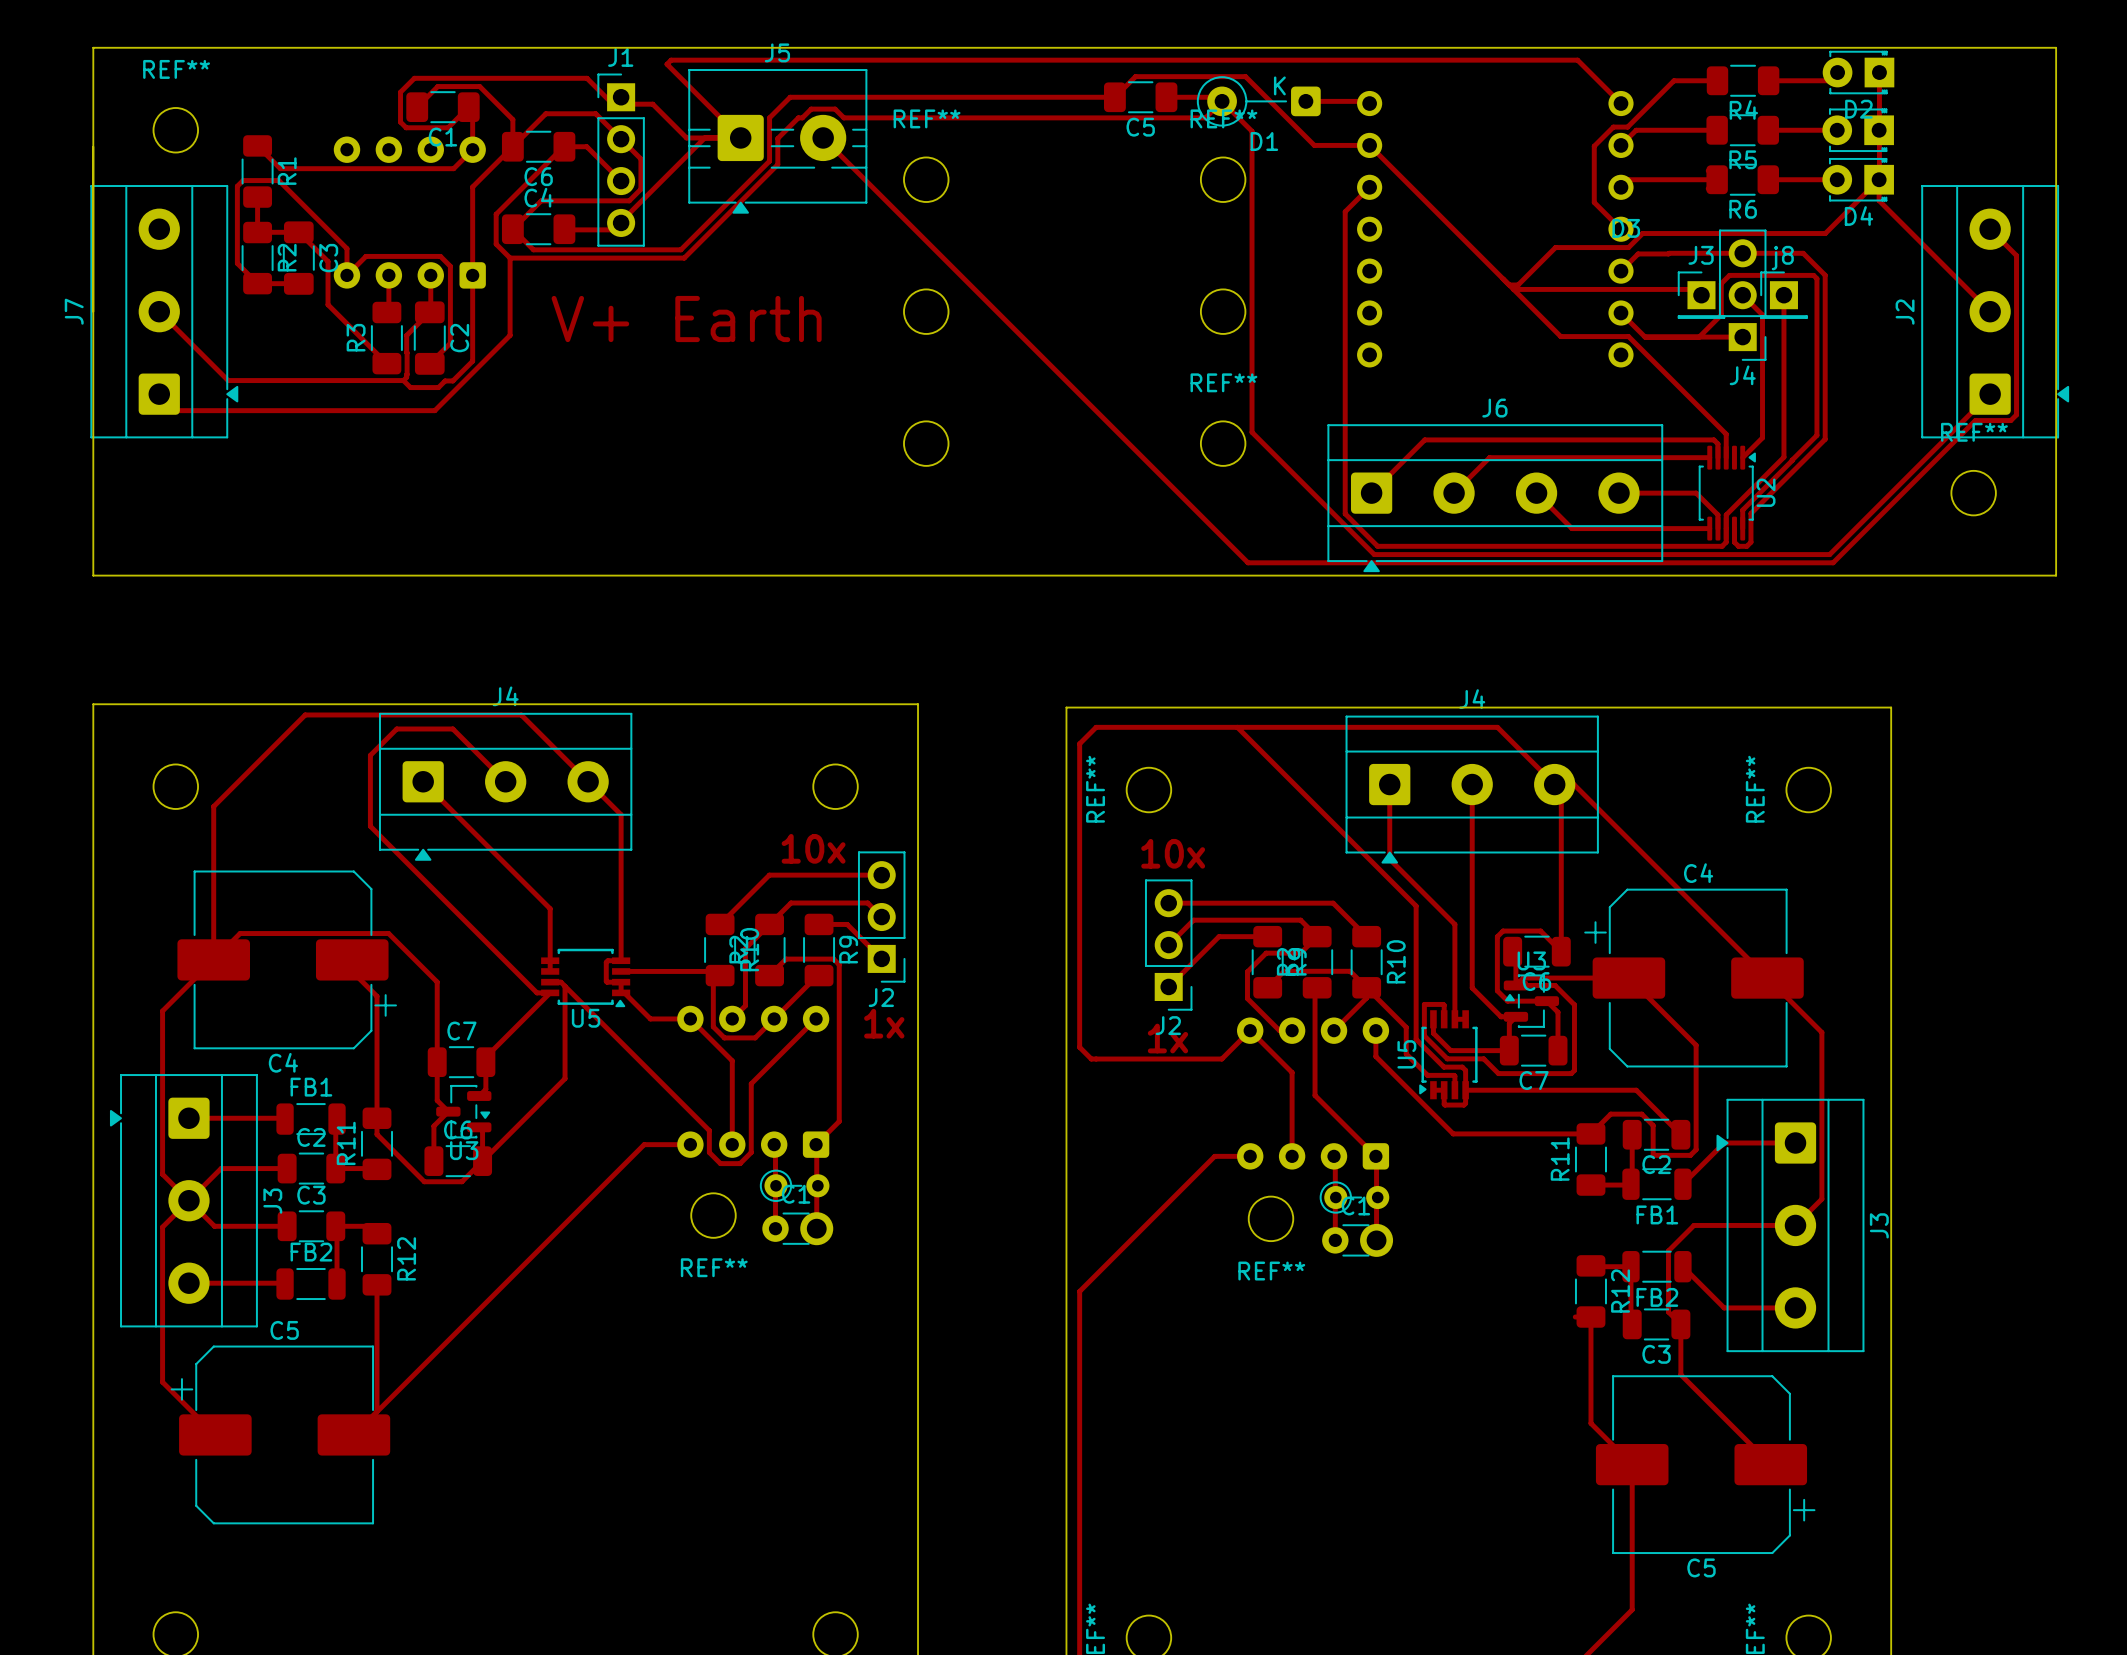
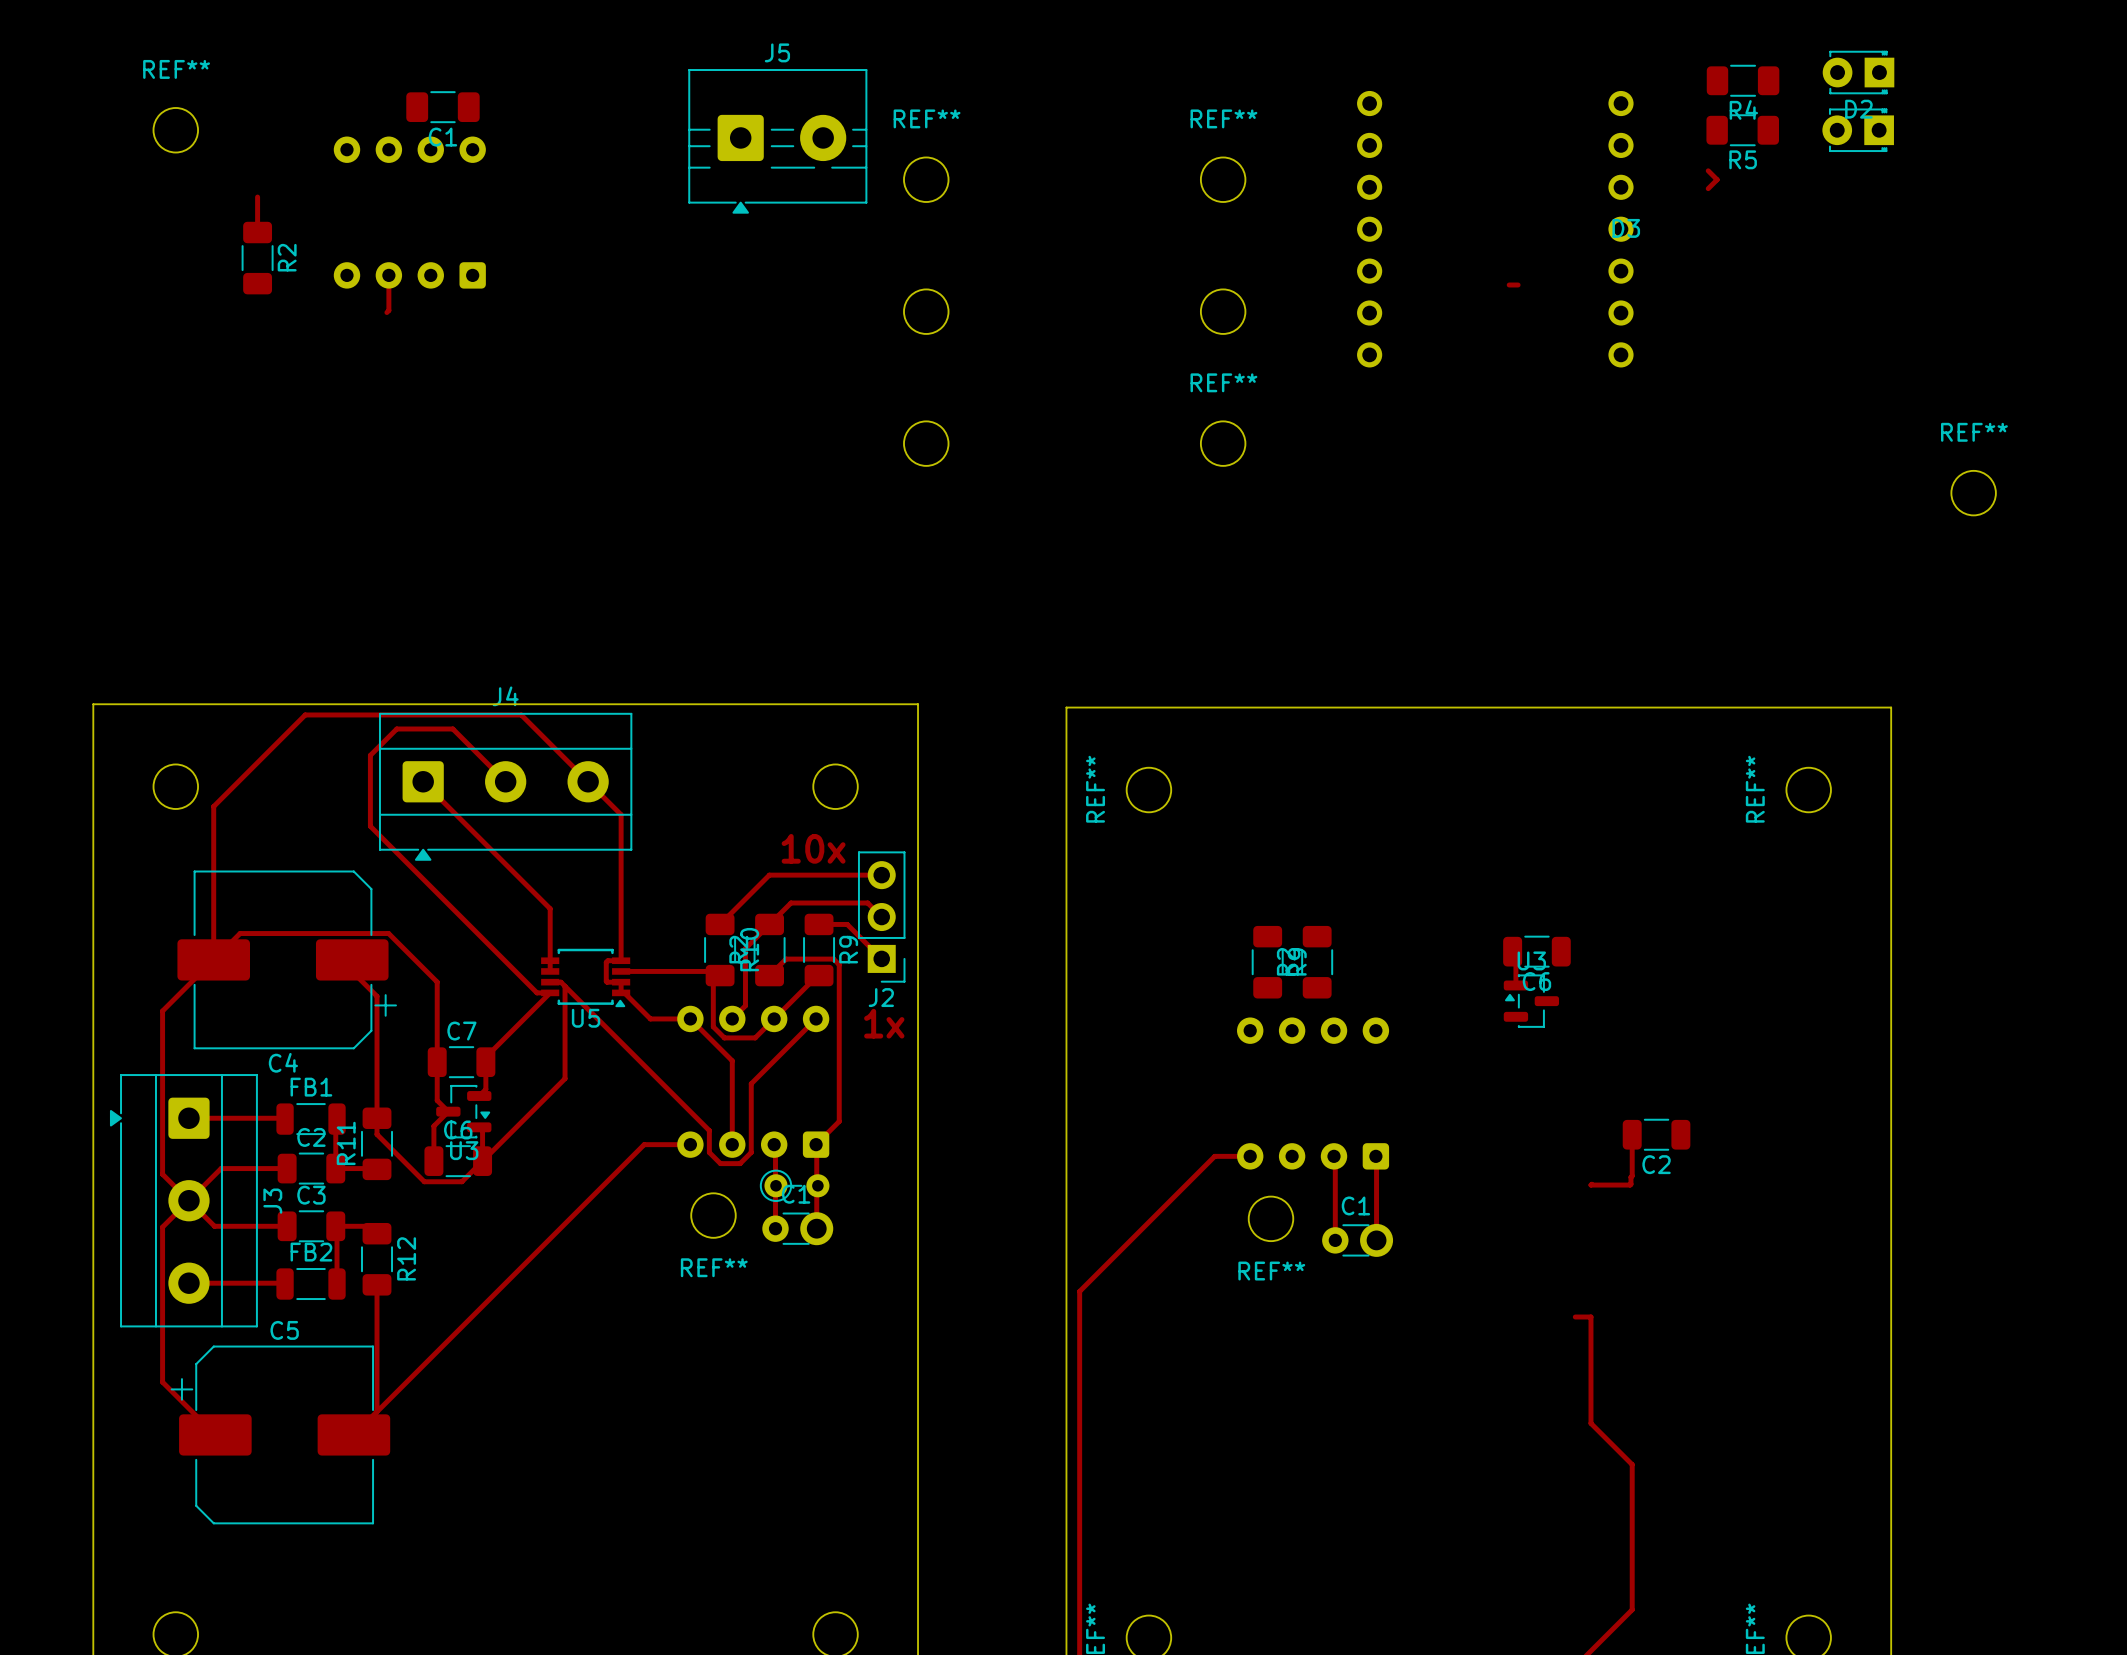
board edge: (93, 47) (93, 575) (2056, 575) (2056, 47) (93, 47) -> none
track: (1837, 72) (1829, 80) (1768, 80) -> none
track: (1879, 72) (1879, 179) (1825, 233) (1642, 233) (1628, 247) (1555, 247) (1513, 289) (1695, 289) (1701, 295) -> none
track: (1717, 80) (1673, 80) (1627, 127) (1613, 127) (1594, 146) (1594, 202) (1620, 229) -> none
C5: (1140, 97) -> none
track: (1166, 97) (1217, 97) (1252, 131) (1252, 432) (1374, 554) (1829, 554) (1990, 394) -> none
track: (1222, 101) (1205, 117) (843, 117) (835, 109) (811, 109) (802, 117) (798, 117) (777, 138) (777, 164) (684, 258) (510, 258) -> none
D1: (1258, 101) -> none
track: (1305, 101) (1367, 101) (1369, 103) -> none
track: (1620, 103) (1577, 60) (671, 60) (667, 64) (740, 137) (686, 137) (652, 104) (612, 104) (586, 78) (414, 78) (400, 92) (400, 122) (406, 127) (448, 127) (468, 107) (472, 111) (472, 149) (453, 168) (280, 168) (257, 145) -> none
track: (417, 107) (437, 86) (479, 86) (512, 119) (512, 146) -> none
track: (1717, 130) (1636, 130) (1620, 145) -> none
track: (1768, 130) (1837, 130) -> none
track: (704, 137) (612, 229) (564, 229) -> none
track: (823, 137) (1248, 562) (1833, 562) (1975, 420) (2010, 420) (2016, 414) (2016, 255) (1990, 229) -> none
C6: (538, 146) -> none
J1: (621, 160) -> none
R1: (257, 171) -> none
track: (1717, 179) (1628, 179) (1620, 187) -> none
R6: (1742, 179) -> none
track: (1768, 179) (1837, 179) -> none
D4: (1858, 179) -> none
track: (1879, 179) (1879, 200) (1990, 311) -> none
track: (621, 181) (586, 146) (563, 146) (496, 214) (496, 244) (510, 258) -> none
track: (1369, 187) (1345, 211) (1345, 513) (1377, 546) (1722, 546) (1726, 542) (1726, 514) (1783, 457) (1783, 295) -> none
C4: (538, 229) -> none
track: (257, 232) (298, 232) (328, 261) (328, 304) (386, 363) -> none
C3: (298, 258) -> none
track: (510, 258) (510, 335) (434, 410) (175, 410) (159, 394) -> none
track: (1620, 271) (1638, 253) (1803, 253) (1825, 275) (1825, 439) (1750, 513) (1750, 542) (1746, 546) (1738, 546) (1734, 542) (1734, 528) -> none
track: (430, 275) (430, 311) (406, 335) (407, 374) (403, 380) -> none
track: (298, 283) (257, 283) (237, 263) (237, 186) (243, 180) (278, 180) (346, 248) (346, 275) (365, 256) (440, 256) (450, 266) (450, 343) (429, 363) -> none
J3: (1701, 295) -> none
track: (1742, 295) (1762, 314) (1762, 437) (1742, 457) -> none
J4: (1742, 295) -> none
j8: (1783, 295) -> none
track: (159, 311) (228, 380) (403, 380) -> none
J7: (164, 311) -> none
J2: (1995, 311) -> none
track: (1620, 313) (1645, 337) (1742, 337) -> none
text: V+ Earth (686, 319) -> none
track: (1699, 337) (1721, 314) (1721, 283) (1729, 275) (1813, 275) (1816, 278) (1816, 435) (1742, 510) (1742, 528) -> none
R3: (386, 338) -> none
C2: (429, 338) -> none
track: (403, 380) (410, 387) (438, 387) (445, 380) (452, 380) (472, 361) (472, 186) (545, 113) (595, 113) (640, 158) (640, 189) (629, 200) (541, 200) (512, 229) (533, 249) (680, 249) (769, 161) (769, 117) (790, 97) (1114, 97) (1135, 76) (1245, 76) (1314, 145) (1369, 145) (1560, 336) (1628, 336) (1726, 434) (1726, 457) -> none
track: (1709, 457) (1489, 457) (1454, 493) -> none
track: (1717, 457) (1717, 444) (1713, 439) (1424, 439) (1371, 493) -> none
track: (1536, 493) (1572, 528) (1709, 528) -> none
track: (1619, 493) (1696, 493) (1717, 514) (1717, 528) -> none
U2: (1727, 493) -> none
J6: (1495, 498) -> none
track: (1237, 727) (1416, 906) (1416, 1039) (1443, 1067) (1462, 1067) (1465, 1070) (1465, 1103) (1463, 1105) (1445, 1105) (1444, 1090) (1433, 1090) -> none
track: (1389, 784) (1389, 859) (1454, 924) (1454, 1019) (1465, 1019) -> none
track: (1472, 784) (1472, 987) (1501, 1016) (1515, 1016) (1509, 1023) (1509, 1050) (1450, 1050) (1433, 1033) (1433, 1019) -> none
track: (1554, 784) (1573, 784) (1821, 1032) (1821, 1199) (1795, 1225) (1693, 1225) (1668, 1250) (1668, 1312) (1680, 1324) (1680, 1374) (1770, 1464) -> none
J4: (1472, 789) -> none
text: 10x (1173, 853) -> none
track: (1168, 903) (1333, 903) (1366, 936) -> none
track: (1267, 936) (1219, 936) (1168, 986) -> none
track: (1168, 945) (1193, 920) (1300, 920) (1317, 936) (1300, 953) (1266, 953) (1247, 971) (1247, 998) (1279, 1030) (1292, 1030) -> none
J2: (1168, 945) -> none
R10: (1366, 962) -> none
C4: (1693, 978) -> none
track: (1267, 987) (1284, 971) (1350, 971) (1406, 1027) (1406, 1053) (1427, 1075) (1454, 1075) (1454, 1090) -> none
track: (1317, 987) (1315, 989) (1315, 1095) (1375, 1156) -> none
track: (1366, 987) (1366, 998) (1334, 1030) -> none
track: (1444, 1019) (1443, 1004) (1424, 1004) (1424, 1035) (1447, 1058) (1483, 1058) (1498, 1073) (1571, 1073) (1574, 1070) (1574, 1004) (1555, 985) (1515, 985) (1523, 978) (1628, 978) (1696, 1045) (1696, 1149) (1690, 1155) (1653, 1155) (1653, 1125) (1641, 1114) (1610, 1114) (1590, 1133) (1453, 1133) (1375, 1056) (1375, 1030) -> none
text: 1x (1167, 1038) -> none
C7: (1533, 1050) -> none
track: (1557, 1050) (1557, 1012) (1546, 1001) (1507, 1001) (1497, 990) (1497, 936) (1503, 931) (1540, 931) (1561, 951) (1561, 791) (1497, 727) (1096, 727) (1079, 743) (1079, 1047) (1091, 1059) (1221, 1059) (1250, 1030) (1292, 1072) (1292, 1156) -> none
U5: (1448, 1054) -> none
track: (1465, 1090) (1636, 1090) (1680, 1134) -> none
track: (1795, 1142) (1724, 1142) (1682, 1184) -> none
R11: (1590, 1159) -> none
FB1: (1656, 1184) -> none
part: (1354, 1197) -> none
J3: (1790, 1225) -> none
track: (1590, 1265) (1630, 1266) (1632, 1324) -> none
FB2: (1656, 1266) -> none
track: (1682, 1266) (1724, 1307) (1795, 1307) -> none
R12: (1590, 1291) -> none
C3: (1656, 1324) -> none
C5: (1705, 1464) -> none

